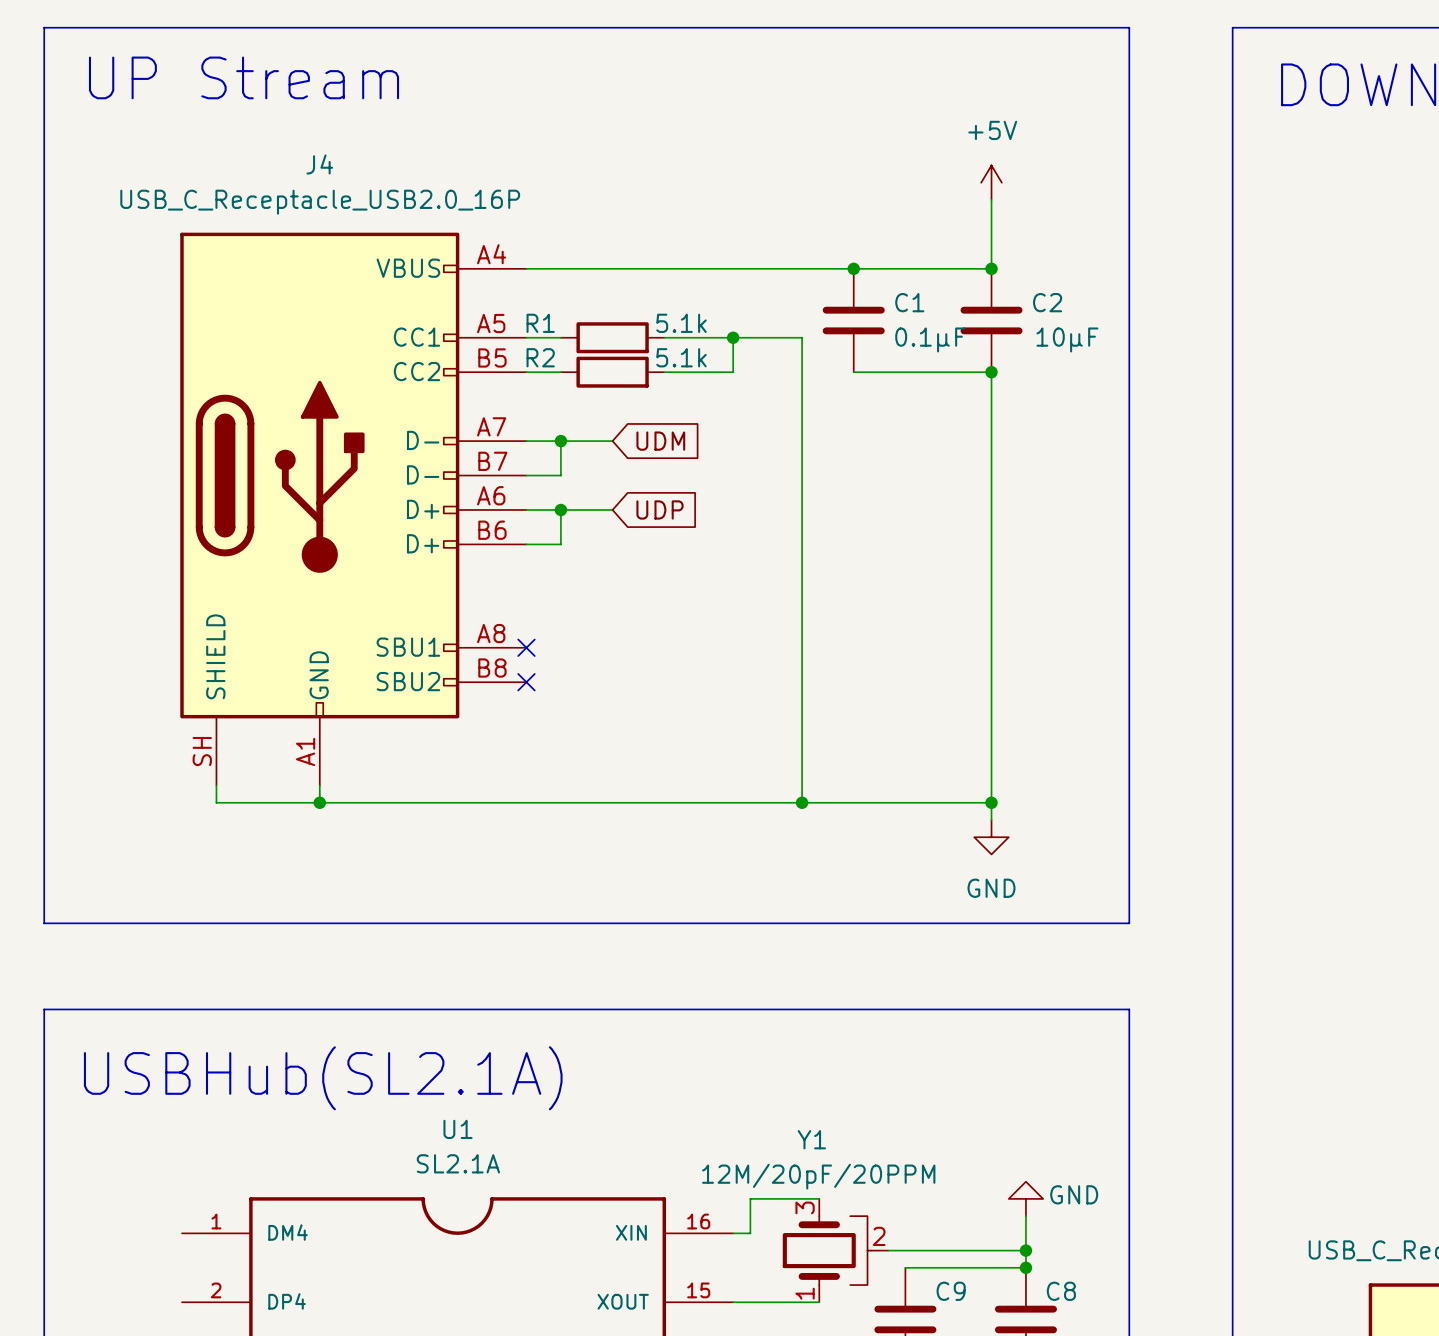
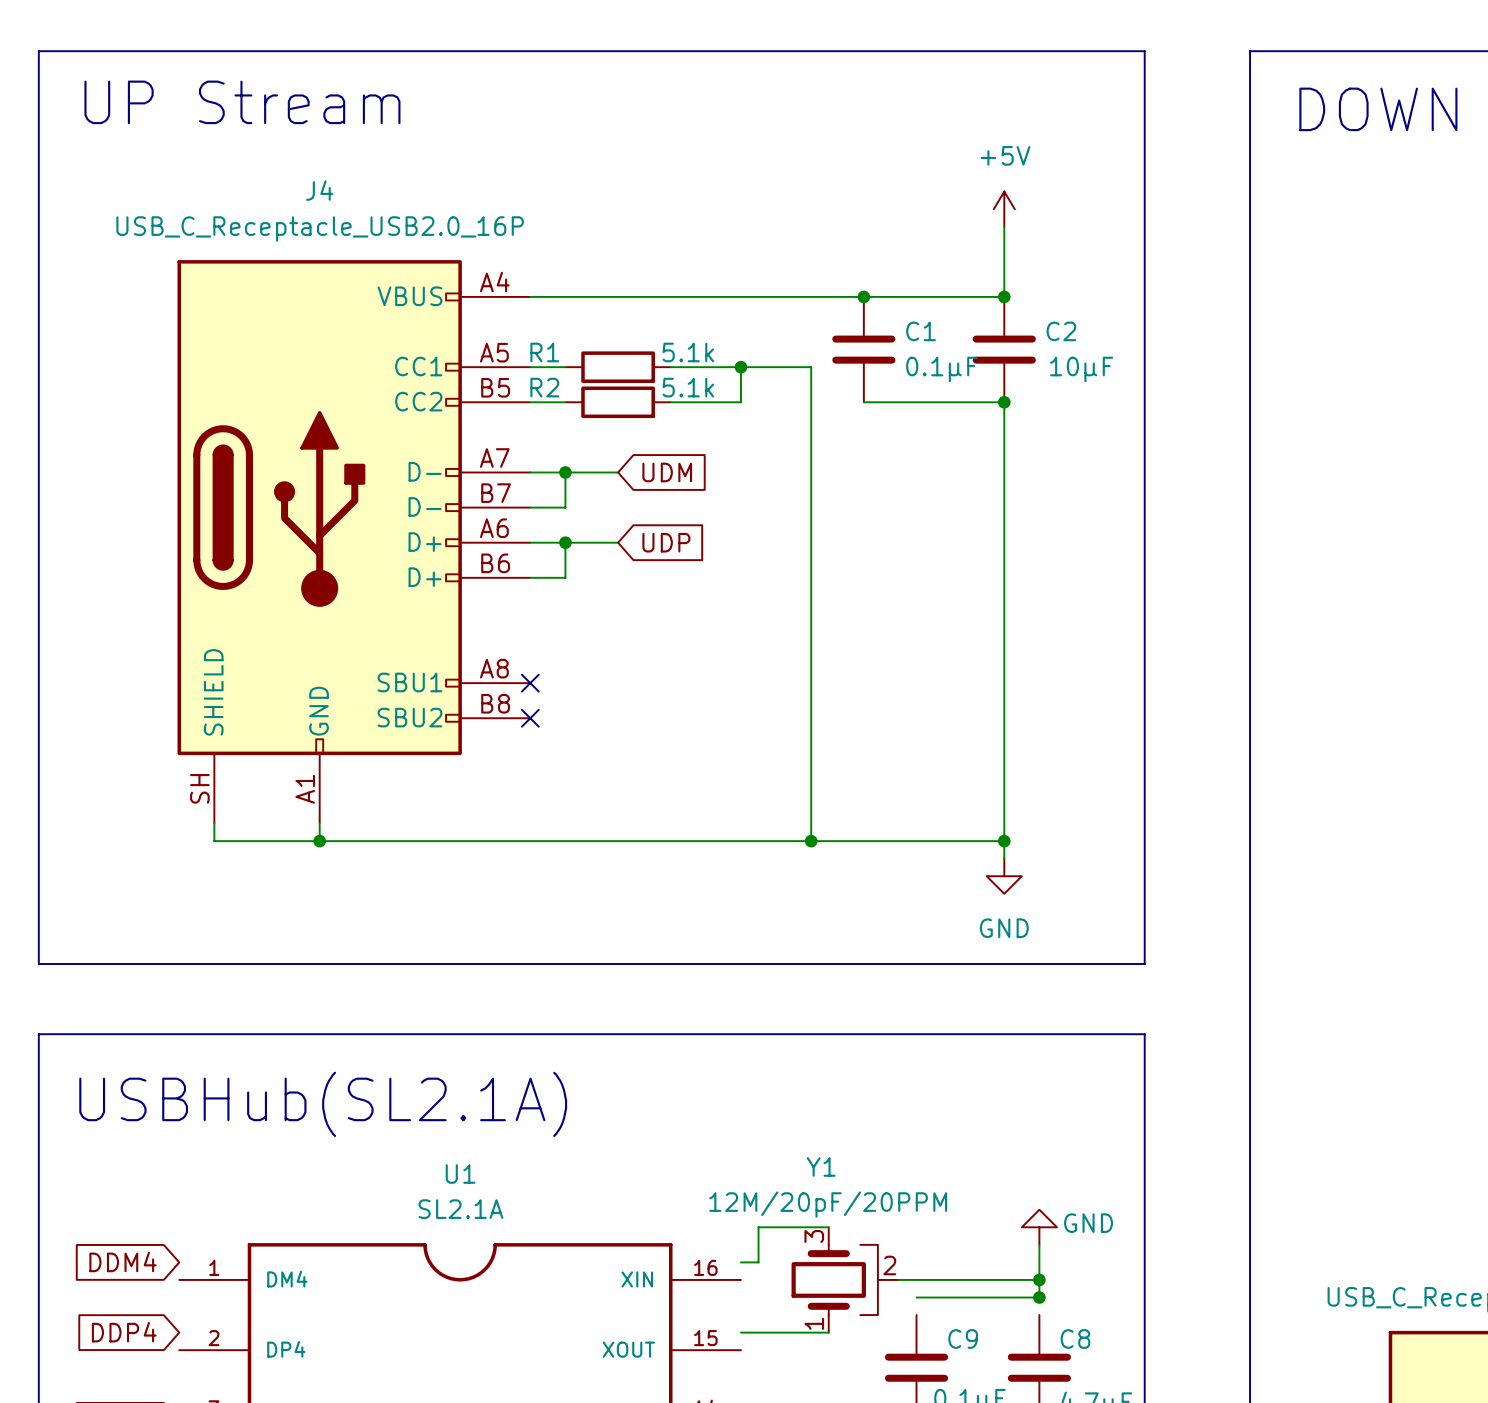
line: (44, 1009) (1129, 1009) -> (38, 1051) (38, 1034) (1144, 1034) (1144, 1051)
text position: USBHub(SL2.1A) (323, 1078) -> USBHub(SL2.1A) (323, 1104)
wire: (750, 1198) (819, 1198) -> (758, 1244) (758, 1227) (828, 1227)
power symbol position: GND (1025, 1198) -> GND (1039, 1227)
global label: none -> DDM4 (123, 1261)
wire: (750, 1216) (750, 1233) (733, 1233) -> (758, 1262) (740, 1262)
wire: none -> (898, 1279) (1039, 1279)
Y1 position: (835, 1250) -> (845, 1279)
wire: (888, 1250) (905, 1250) -> none
wire: (1025, 1250) (1025, 1267) (905, 1267) -> none
junction position: (1025, 1267) -> (1039, 1279)
global label: none -> DDP4 (124, 1332)
wire: (733, 1302) (819, 1302) -> (740, 1332) (828, 1332)

